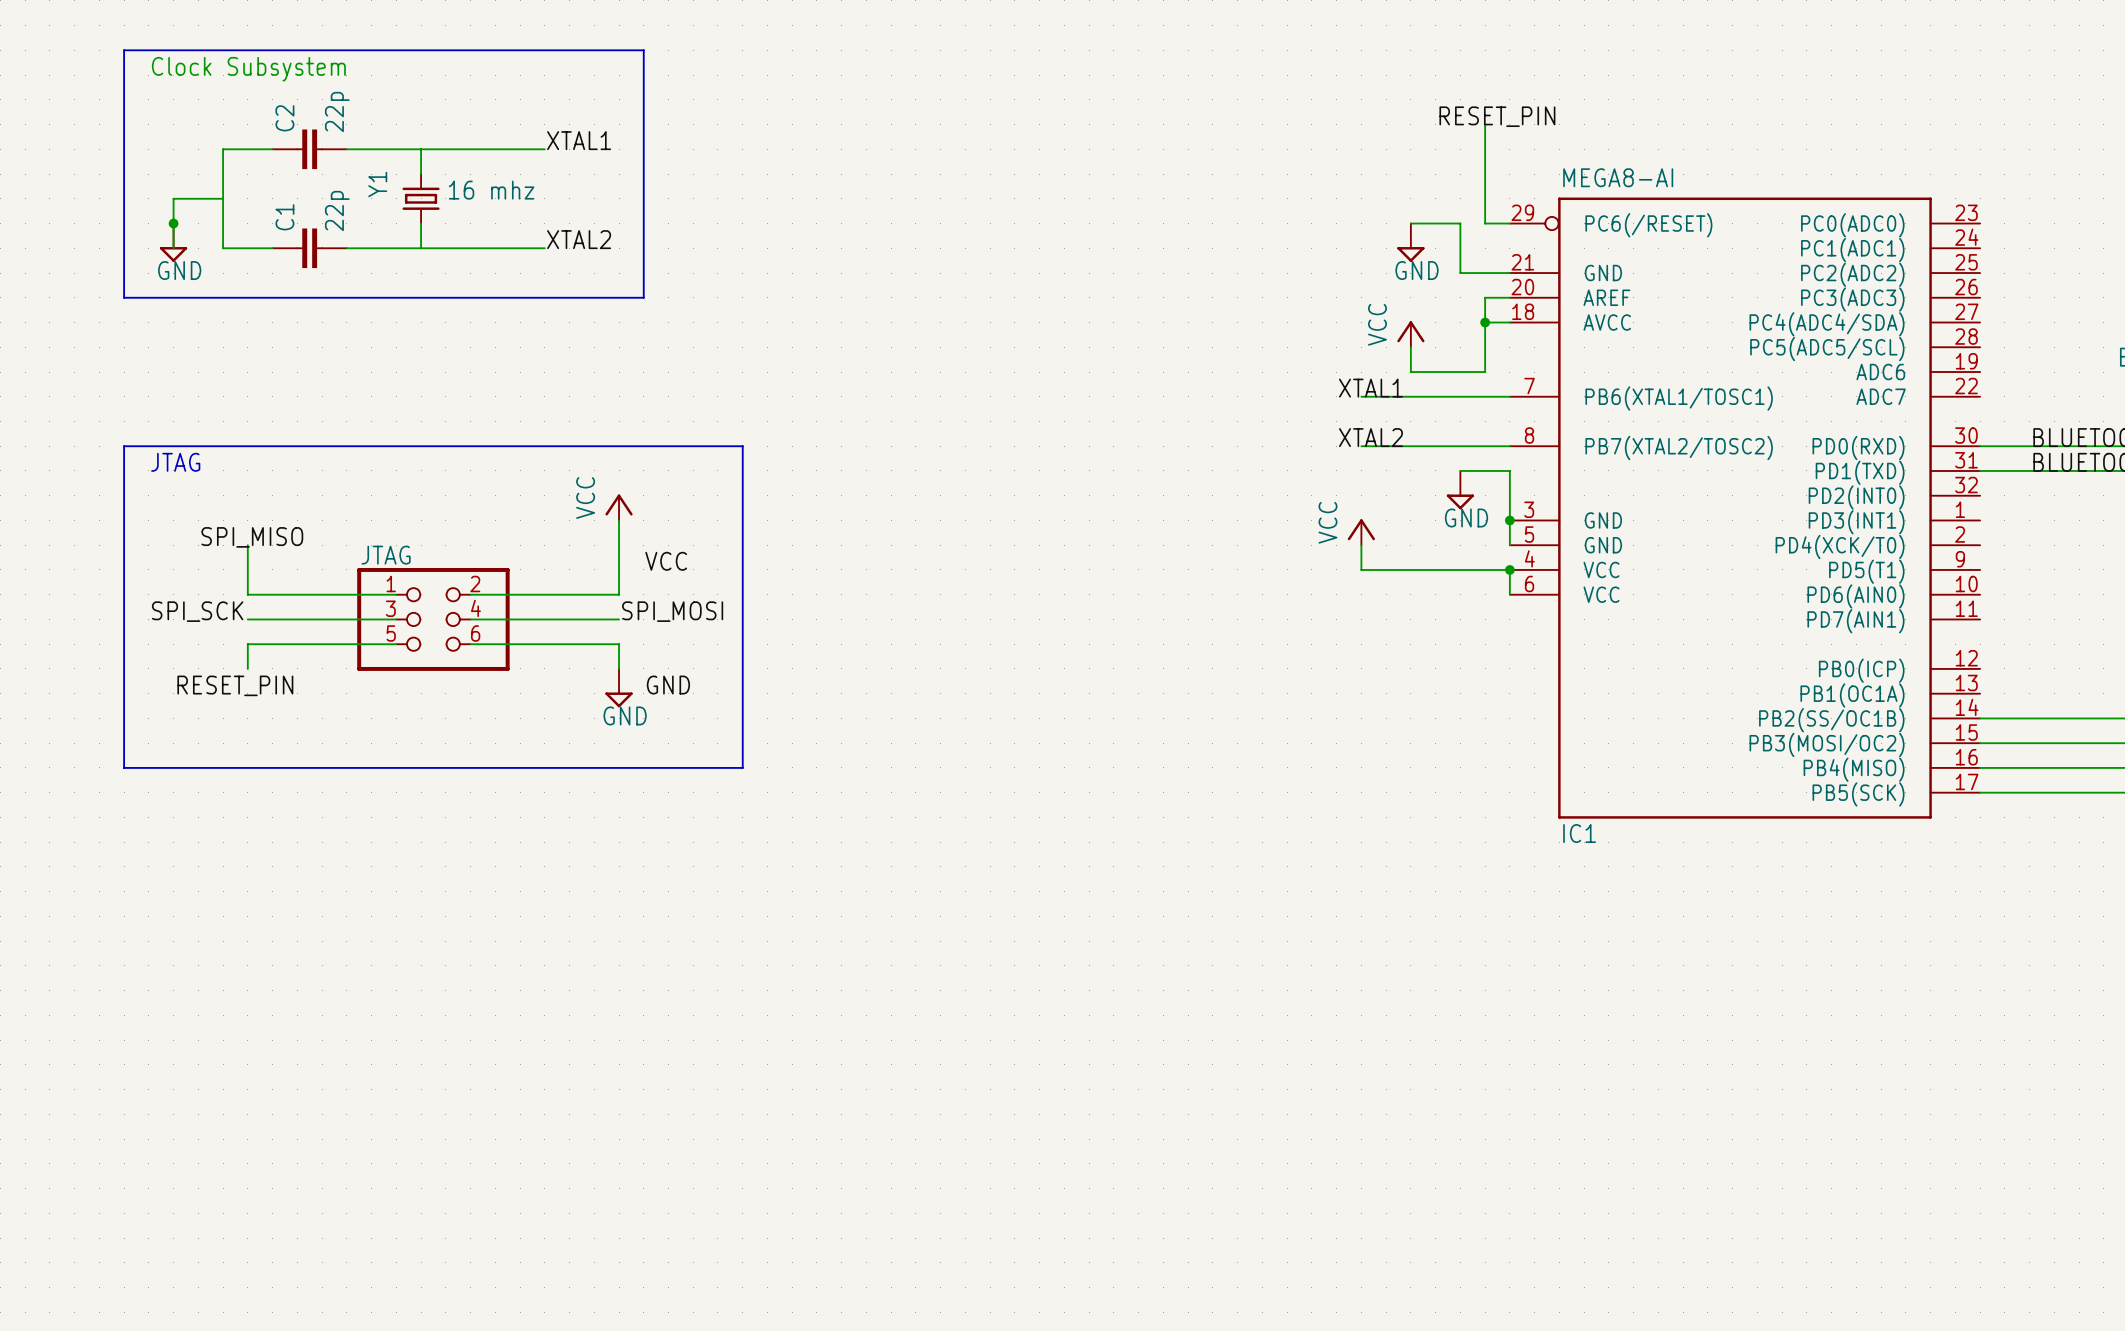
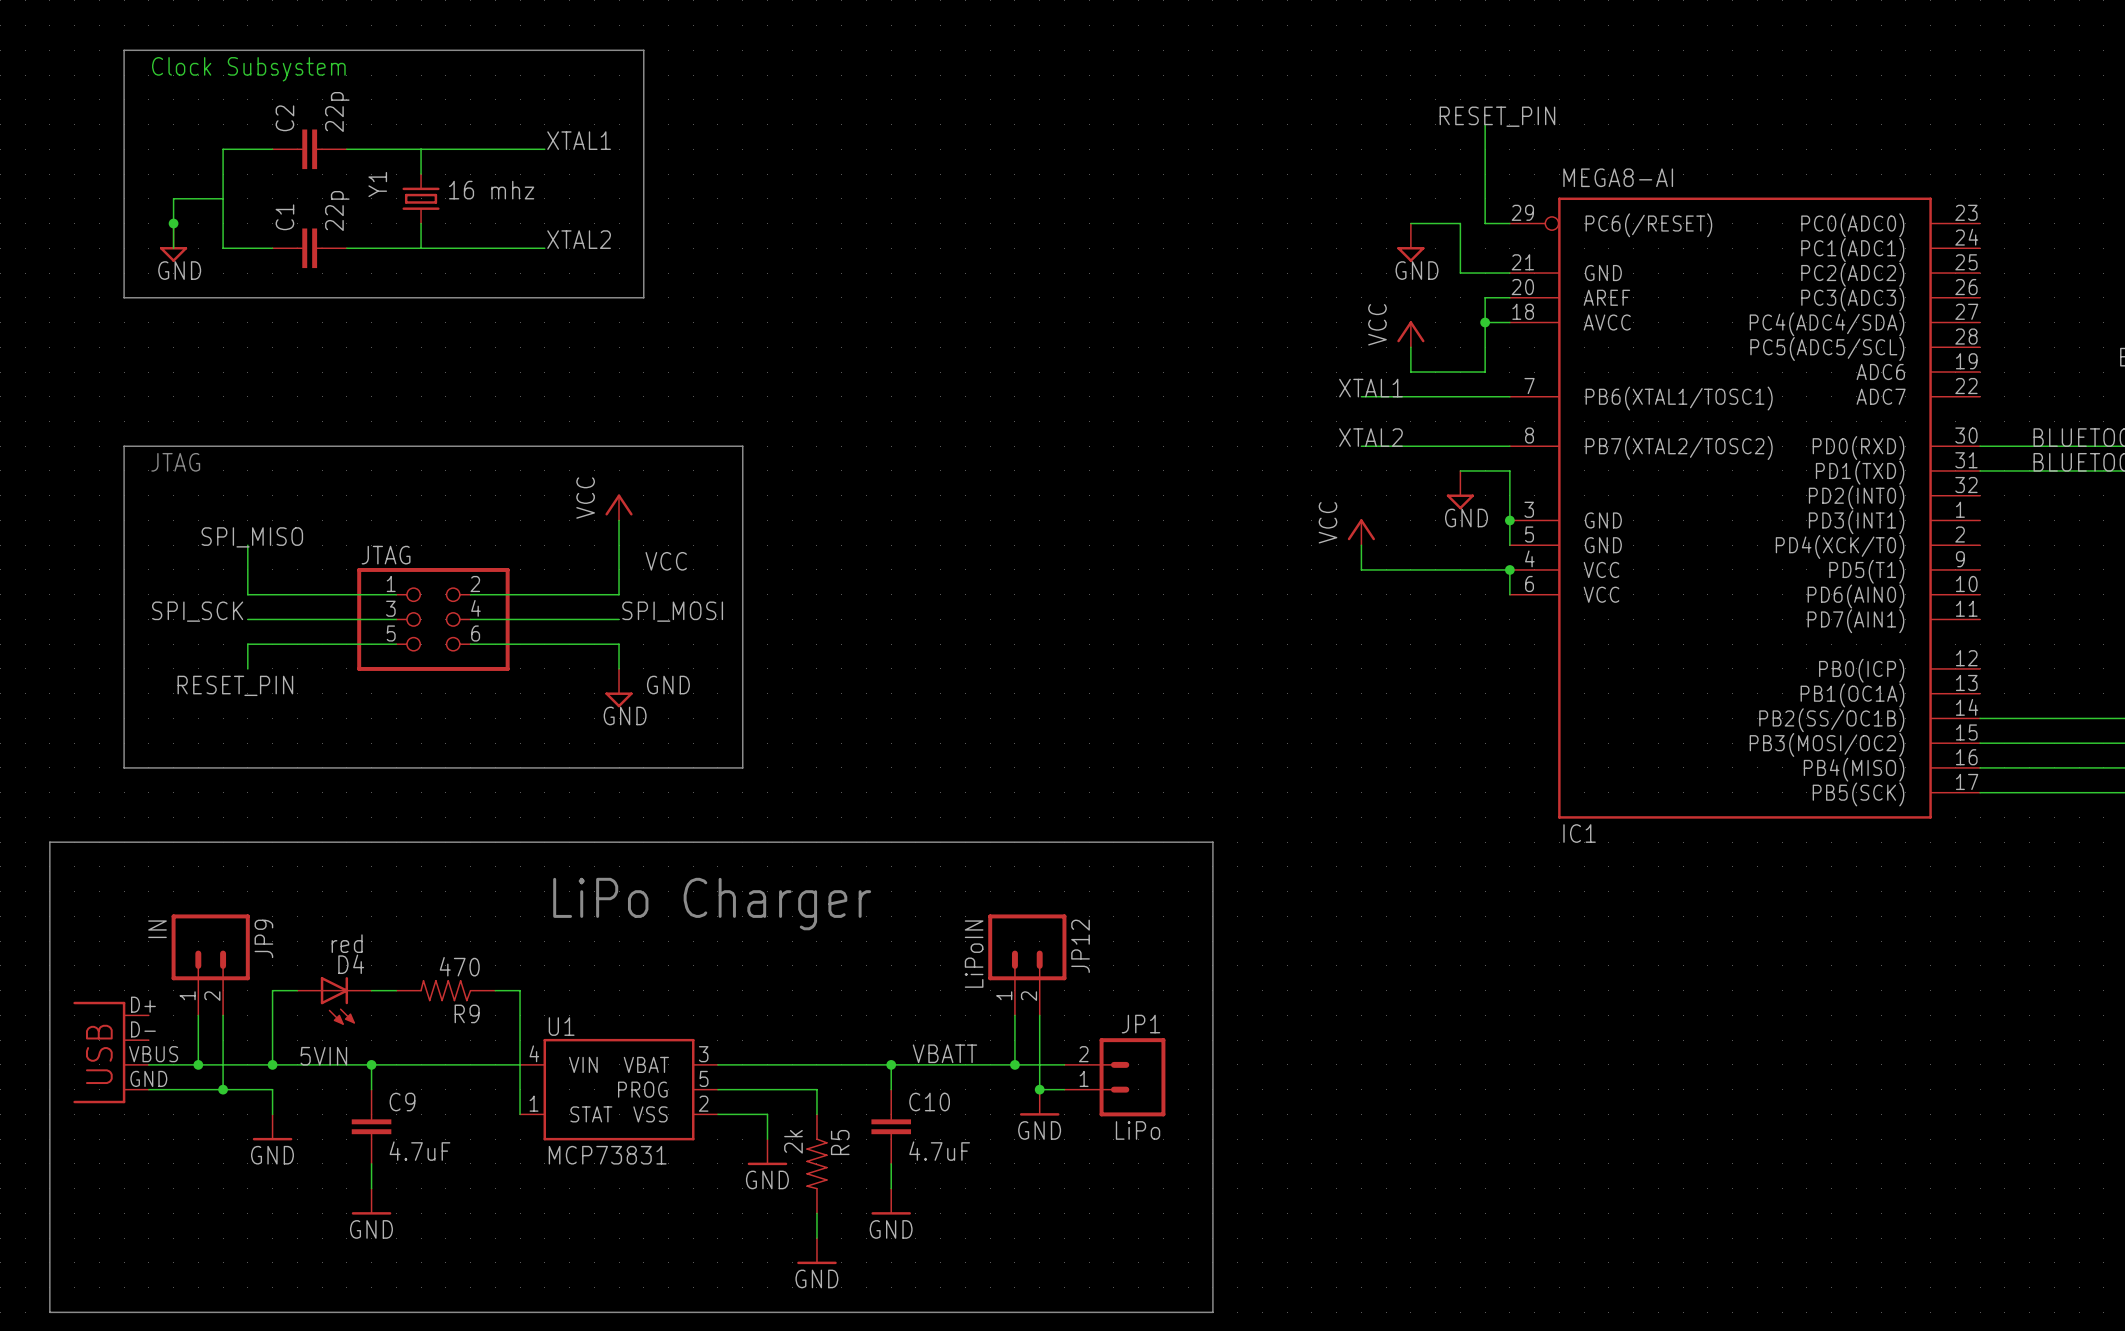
line: none -> (49, 842) (49, 1312) (1212, 1312) (1212, 842) (49, 842)
text: none -> LiPo Charger (712, 904)
JP9: none -> IN (210, 964)
JP12: none -> LiPoIN (1027, 964)
wire: none -> (297, 990) (272, 990) (272, 1064)
wire: none -> (371, 990) (396, 990)
R9: none -> 470 (445, 990)
wire: none -> (495, 990) (520, 990) (520, 1114)
D4: none -> red (334, 1000)
wire: none -> (198, 1015) (198, 1064)
wire: none -> (223, 1015) (223, 1089)
wire: none -> (1014, 1015) (1014, 1064)
wire: none -> (1039, 1015) (1039, 1089) (1064, 1089)
part: none -> (111, 1052)
label: none -> VBATT (944, 1053)
label: none -> 5VIN (323, 1056)
wire: none -> (148, 1064) (520, 1064)
junction: none -> (198, 1064)
junction: none -> (272, 1064)
wire: none -> (371, 1064) (371, 1089)
junction: none -> (371, 1064)
wire: none -> (717, 1064) (1064, 1064)
wire: none -> (891, 1064) (891, 1089)
junction: none -> (891, 1064)
junction: none -> (1014, 1064)
JP1: none -> LiPo (1114, 1077)
wire: none -> (148, 1089) (272, 1089) (272, 1114)
junction: none -> (223, 1089)
U1: none -> MCP73831 (619, 1089)
wire: none -> (717, 1089) (816, 1089) (816, 1114)
junction: none -> (1039, 1089)
power symbol: none -> GND (1039, 1102)
wire: none -> (717, 1114) (767, 1114) (767, 1139)
C9: none -> 4.7uF (371, 1126)
C10: none -> 4.7uF (891, 1126)
power symbol: none -> GND (272, 1127)
power symbol: none -> GND (767, 1152)
wire: none -> (371, 1163) (371, 1188)
R5: none -> 2k (816, 1163)
wire: none -> (891, 1163) (891, 1188)
power symbol: none -> GND (371, 1201)
power symbol: none -> GND (891, 1201)
wire: none -> (816, 1213) (816, 1238)
power symbol: none -> GND (816, 1251)

